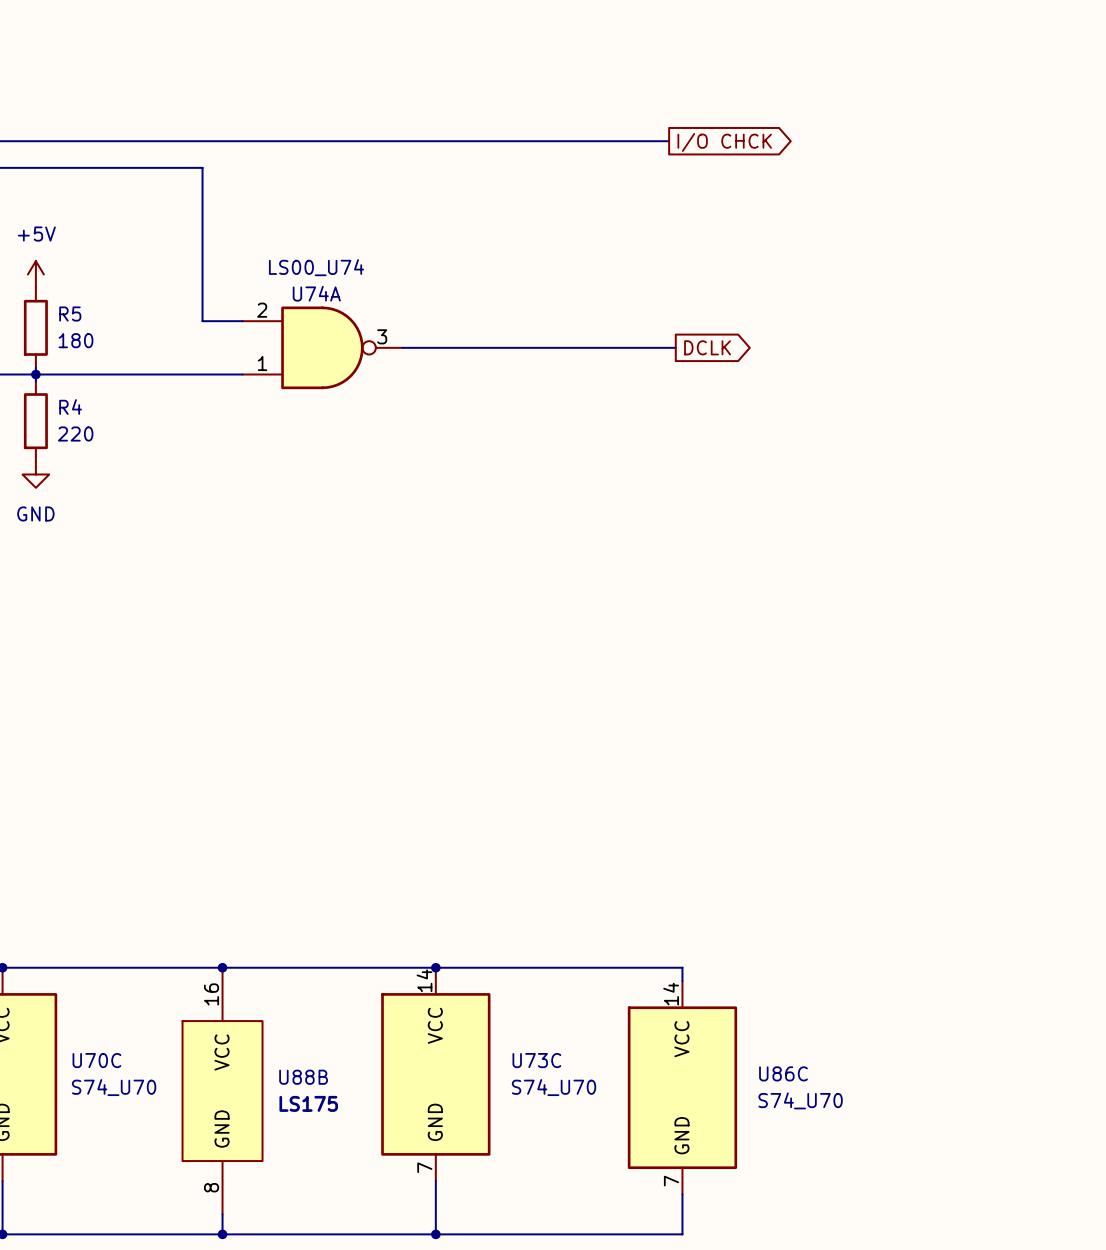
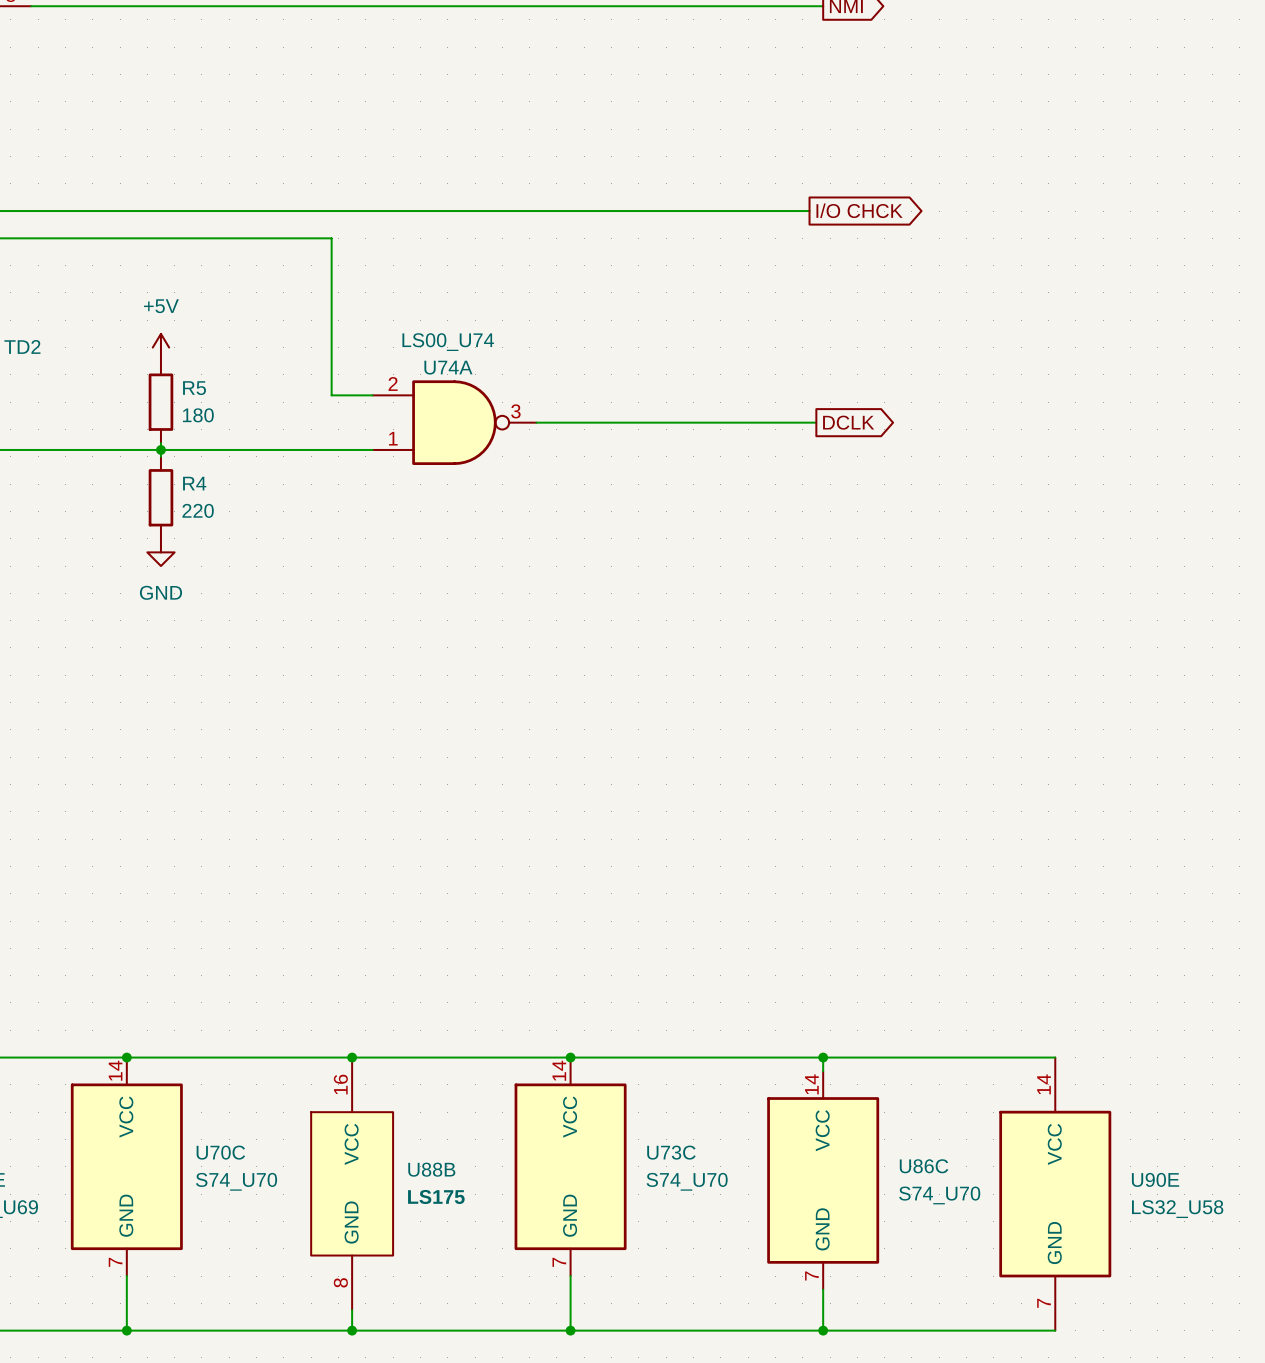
wire: none -> (823, 1057) (1055, 1057)
junction: none -> (823, 1057)
U90E: none -> LS32_U58 (1055, 1194)
wire: none -> (823, 1330) (1055, 1330)
junction: none -> (823, 1330)

